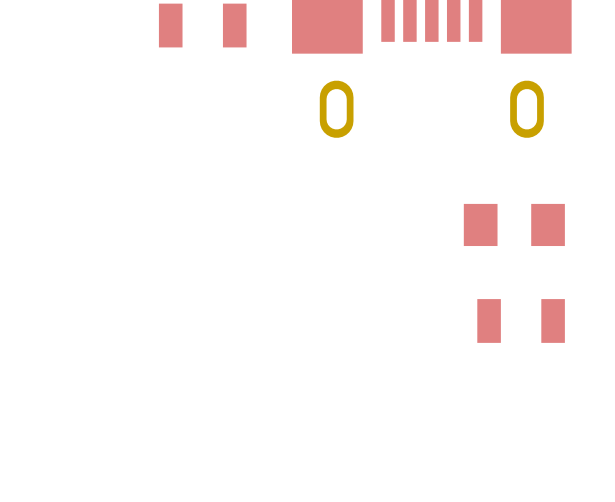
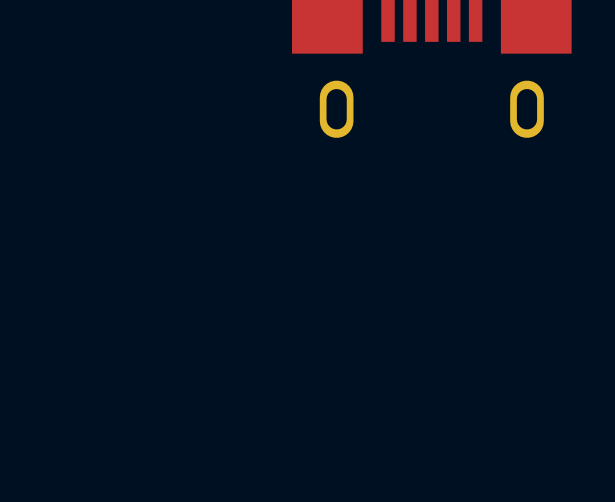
part: (202, 25) -> none
part: (514, 224) -> none
part: (521, 320) -> none

